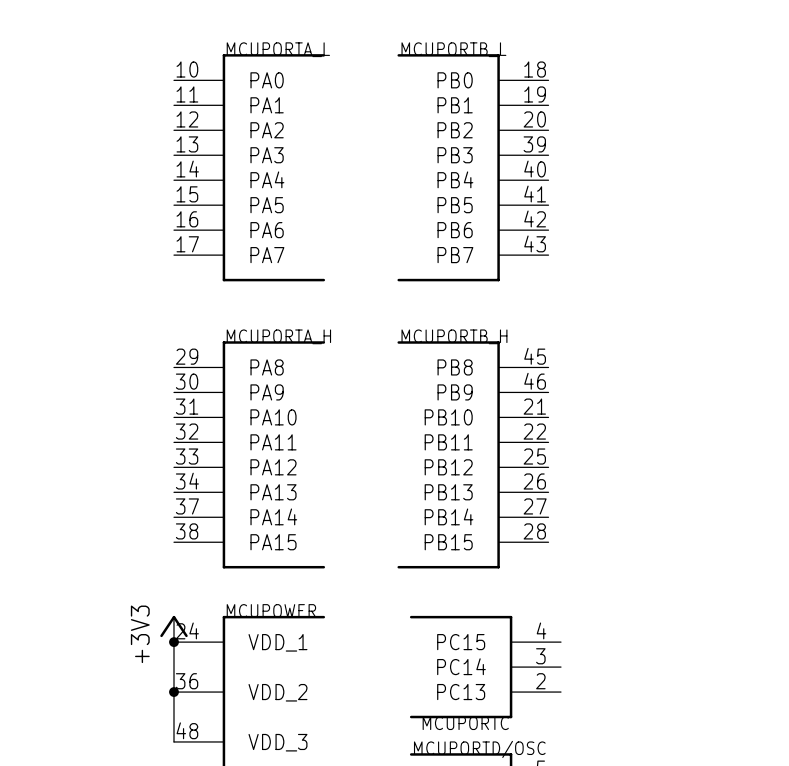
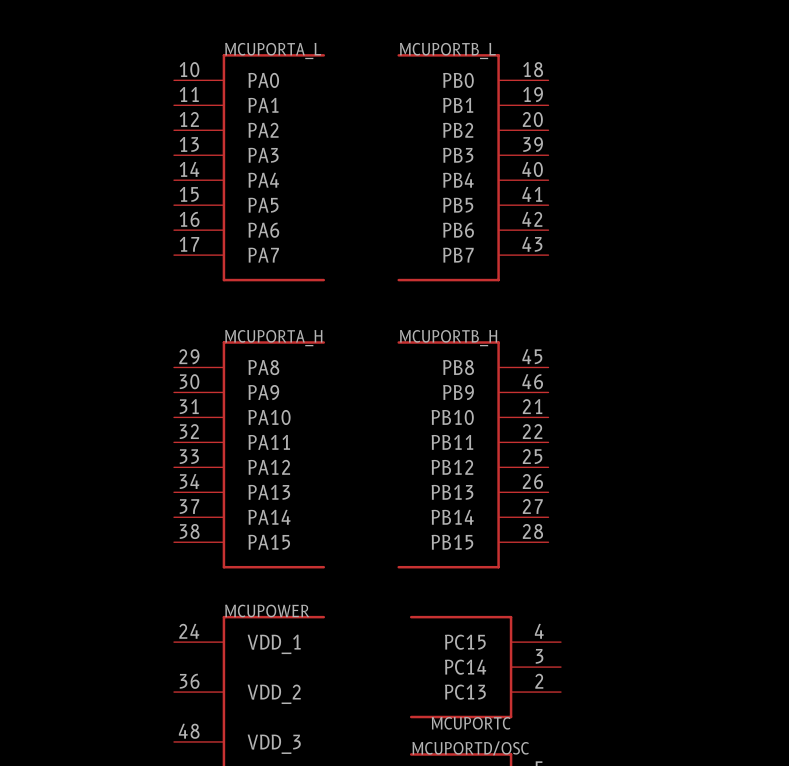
power symbol: +3V3 (173, 629) -> none
wire: (173, 642) (173, 741) -> none
junction: (173, 642) -> none
junction: (173, 692) -> none

